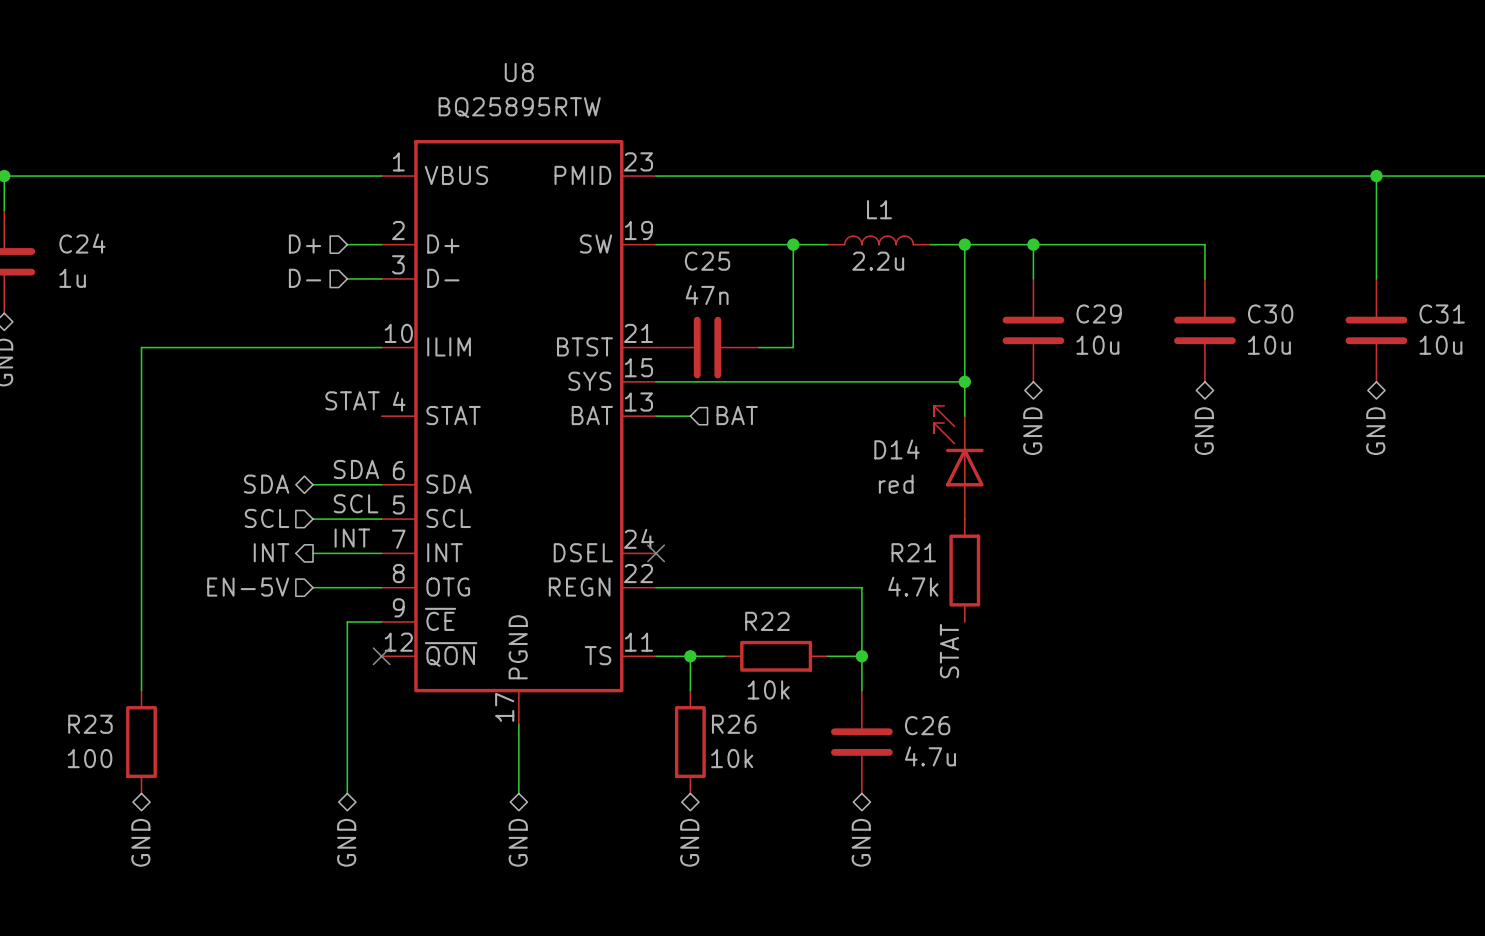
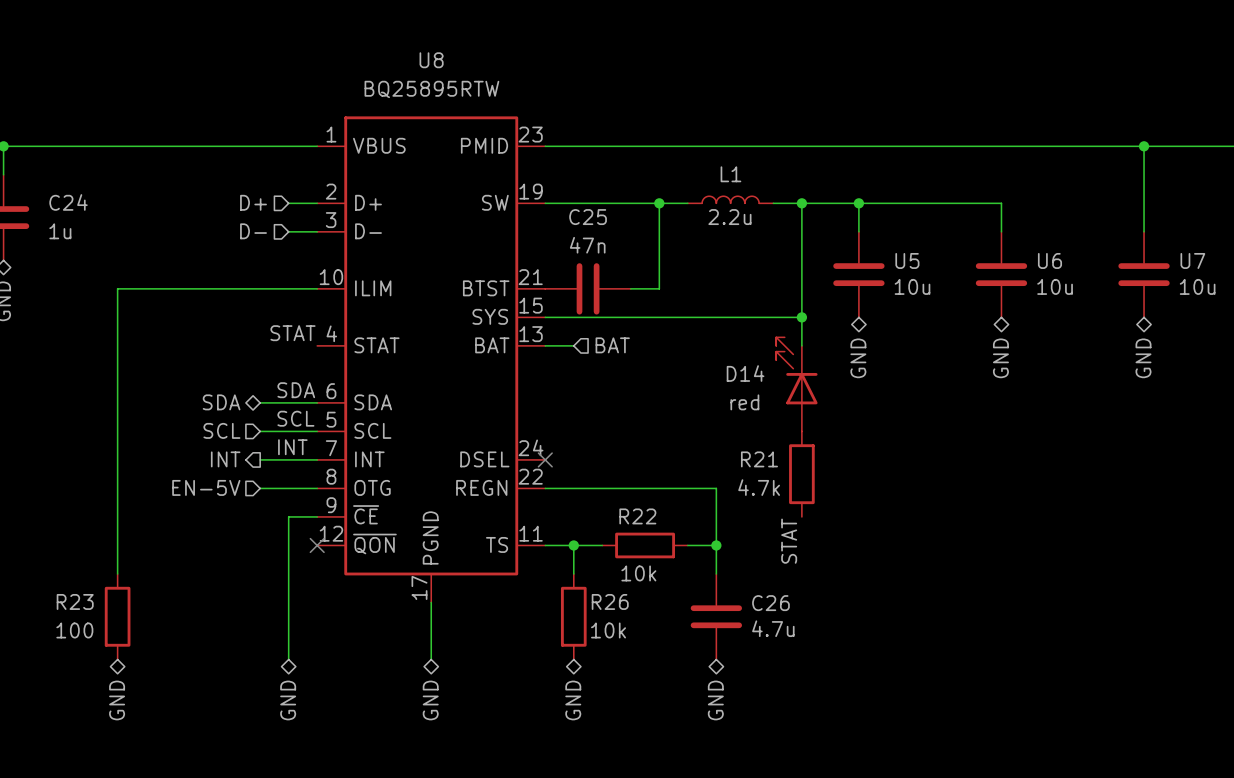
C29 name: C29 (1099, 313) -> U5 (907, 260)
C30 name: C30 (1270, 313) -> U6 (1049, 260)
C31 name: C31 (1442, 313) -> U7 (1192, 260)

